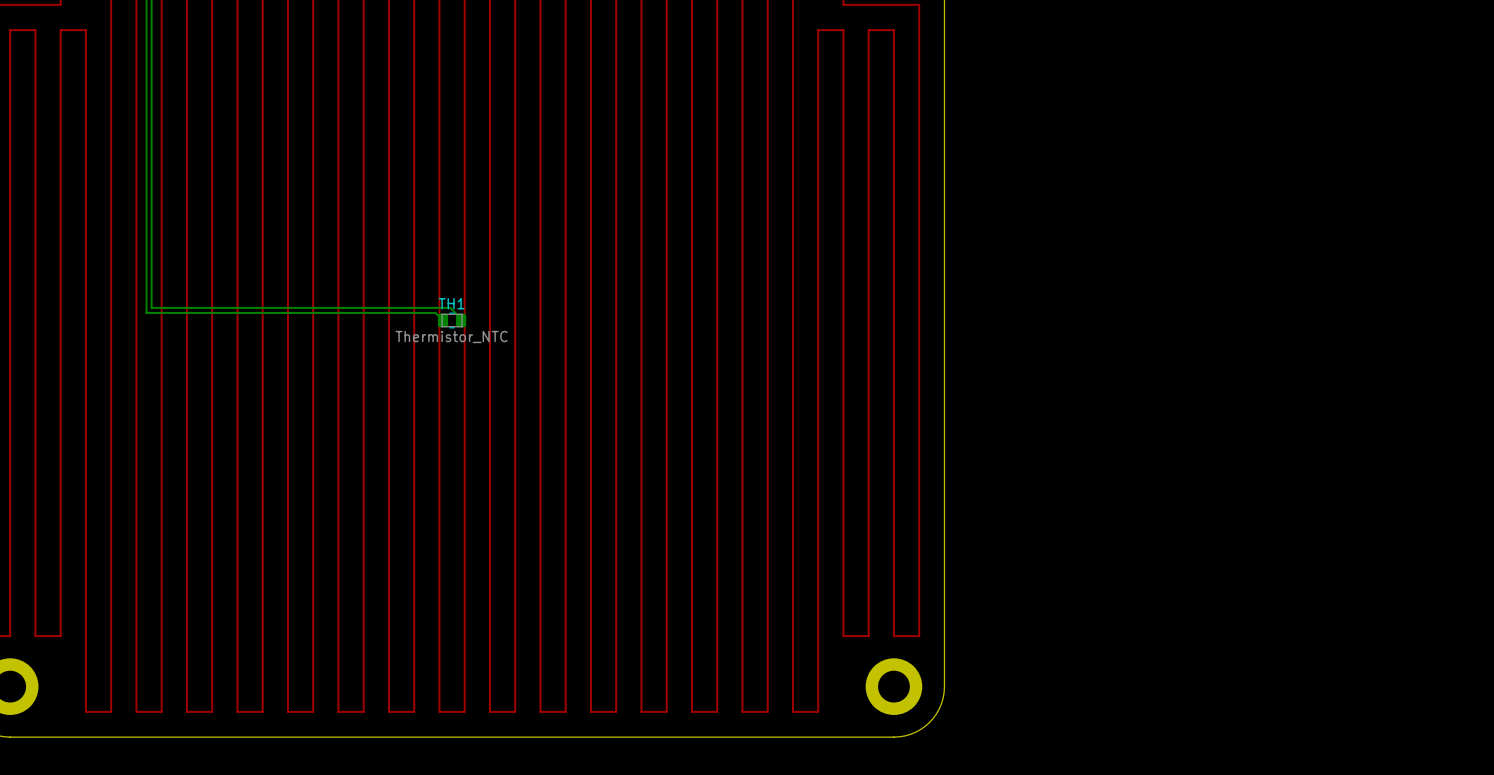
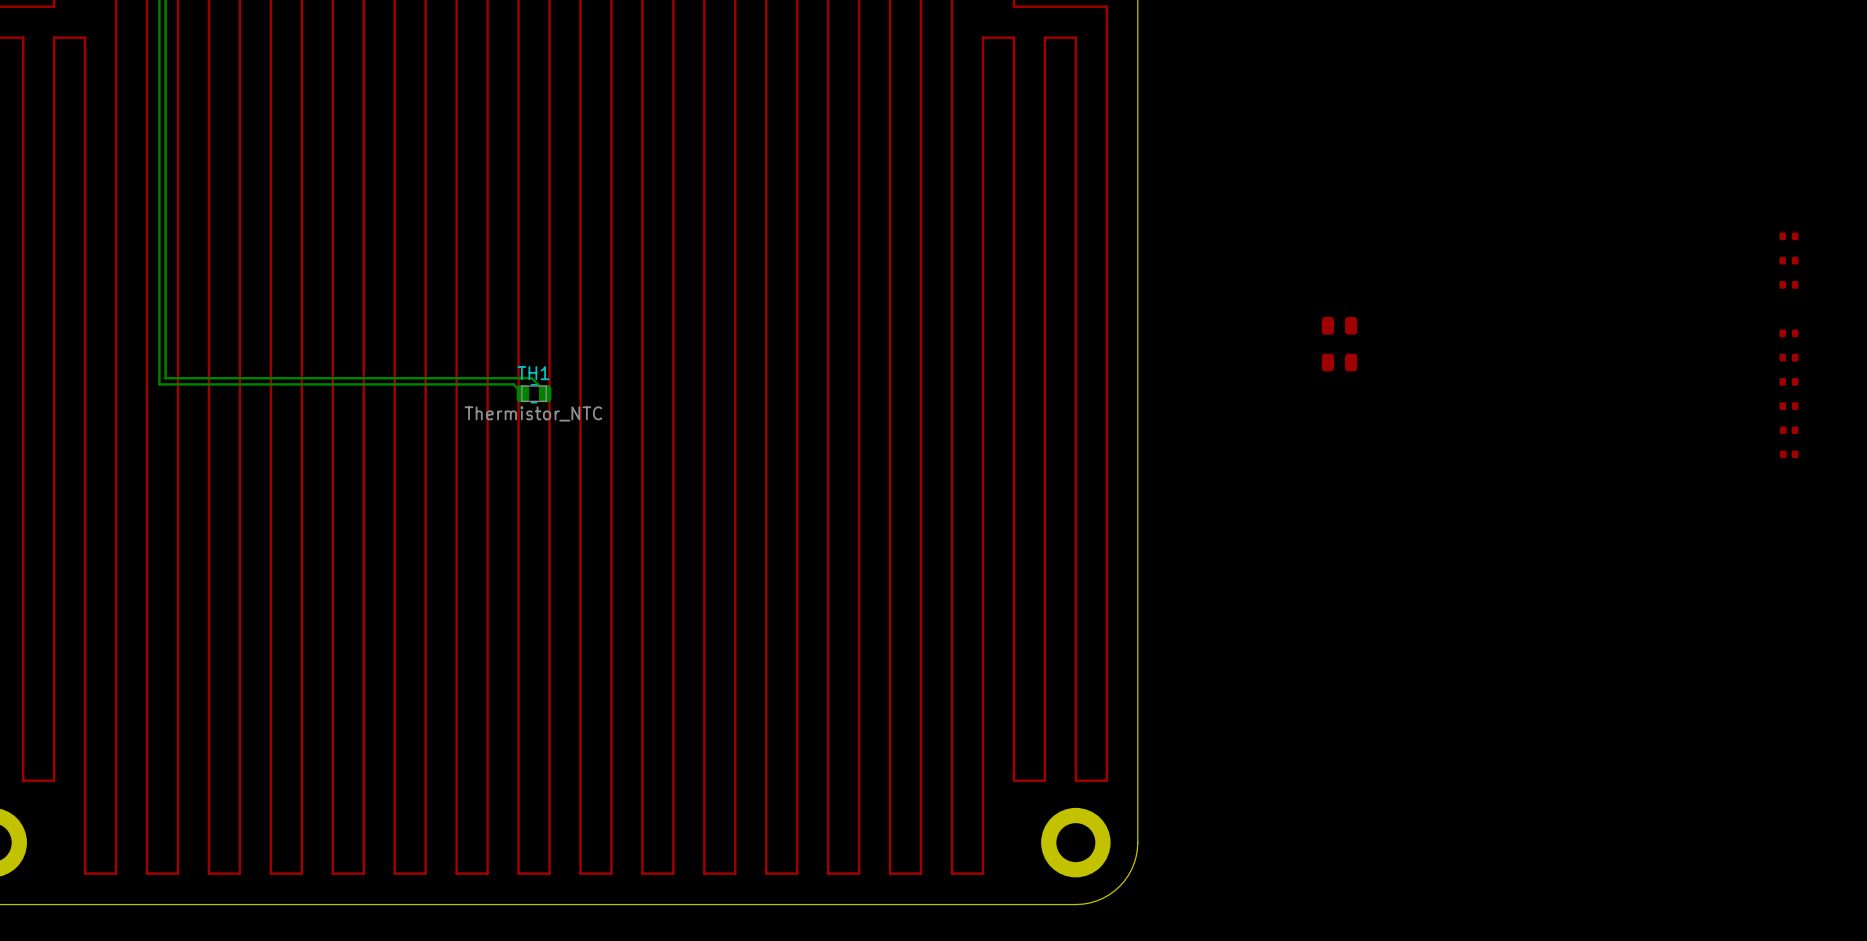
part: none -> (1788, 236)
part: none -> (1788, 260)
part: none -> (1788, 284)
part: none -> (1339, 325)
part: none -> (1788, 333)
part: none -> (1788, 357)
part: none -> (1339, 362)
part: none -> (1788, 381)
part: none -> (1788, 406)
part: none -> (1789, 430)
part: none -> (1789, 454)

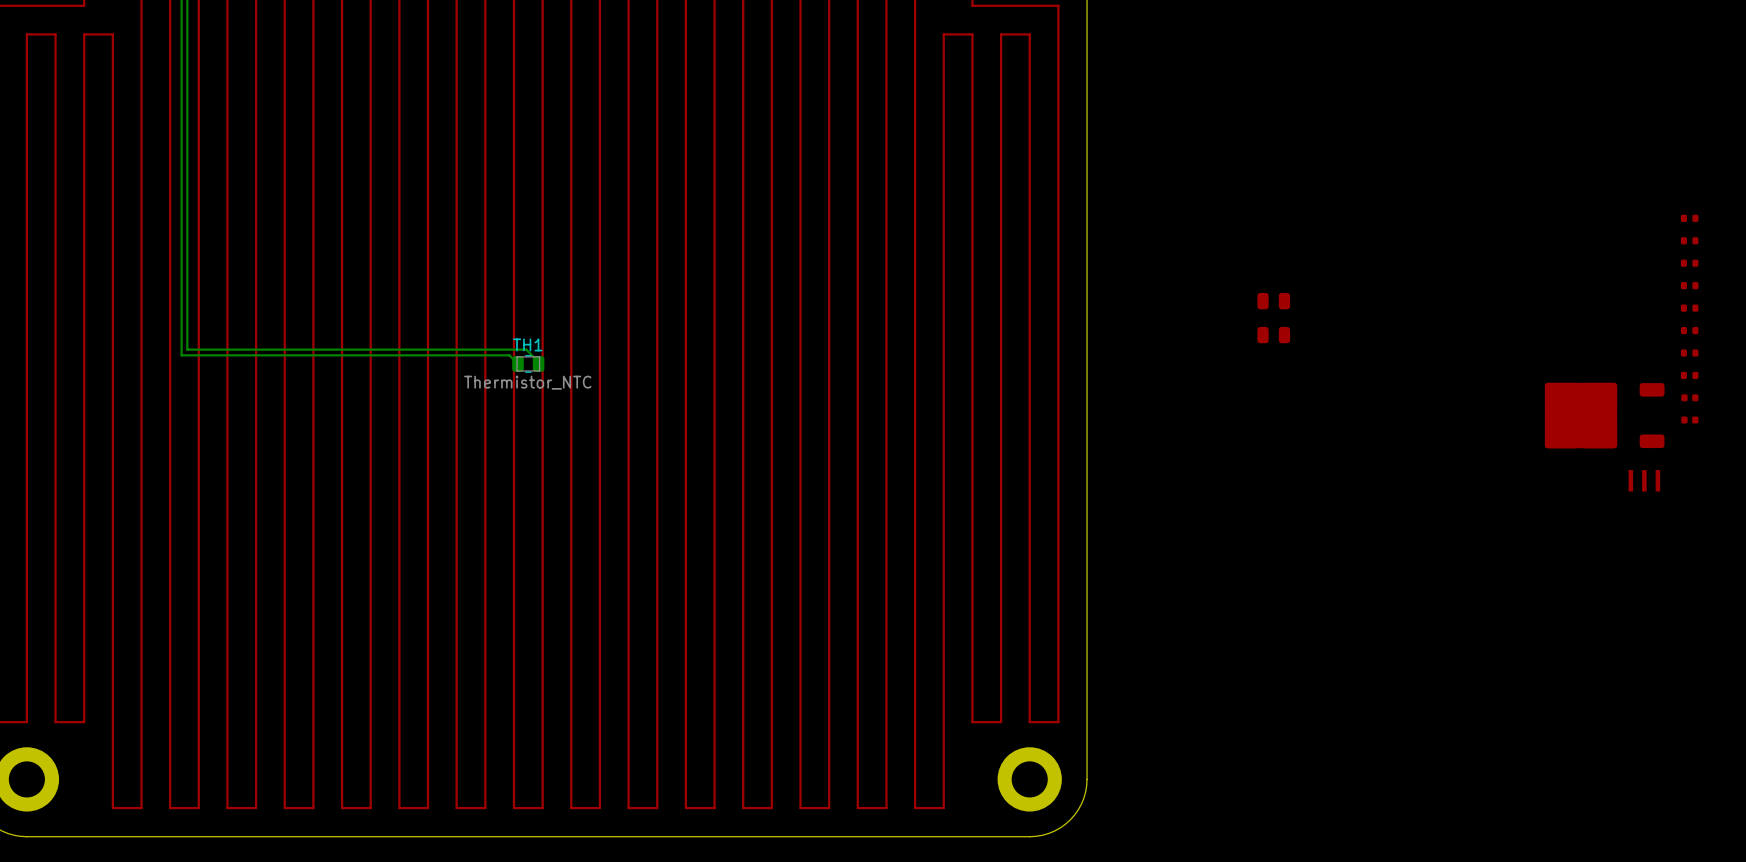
part: none -> (1689, 285)
part: none -> (1604, 415)
part: none -> (1644, 480)

